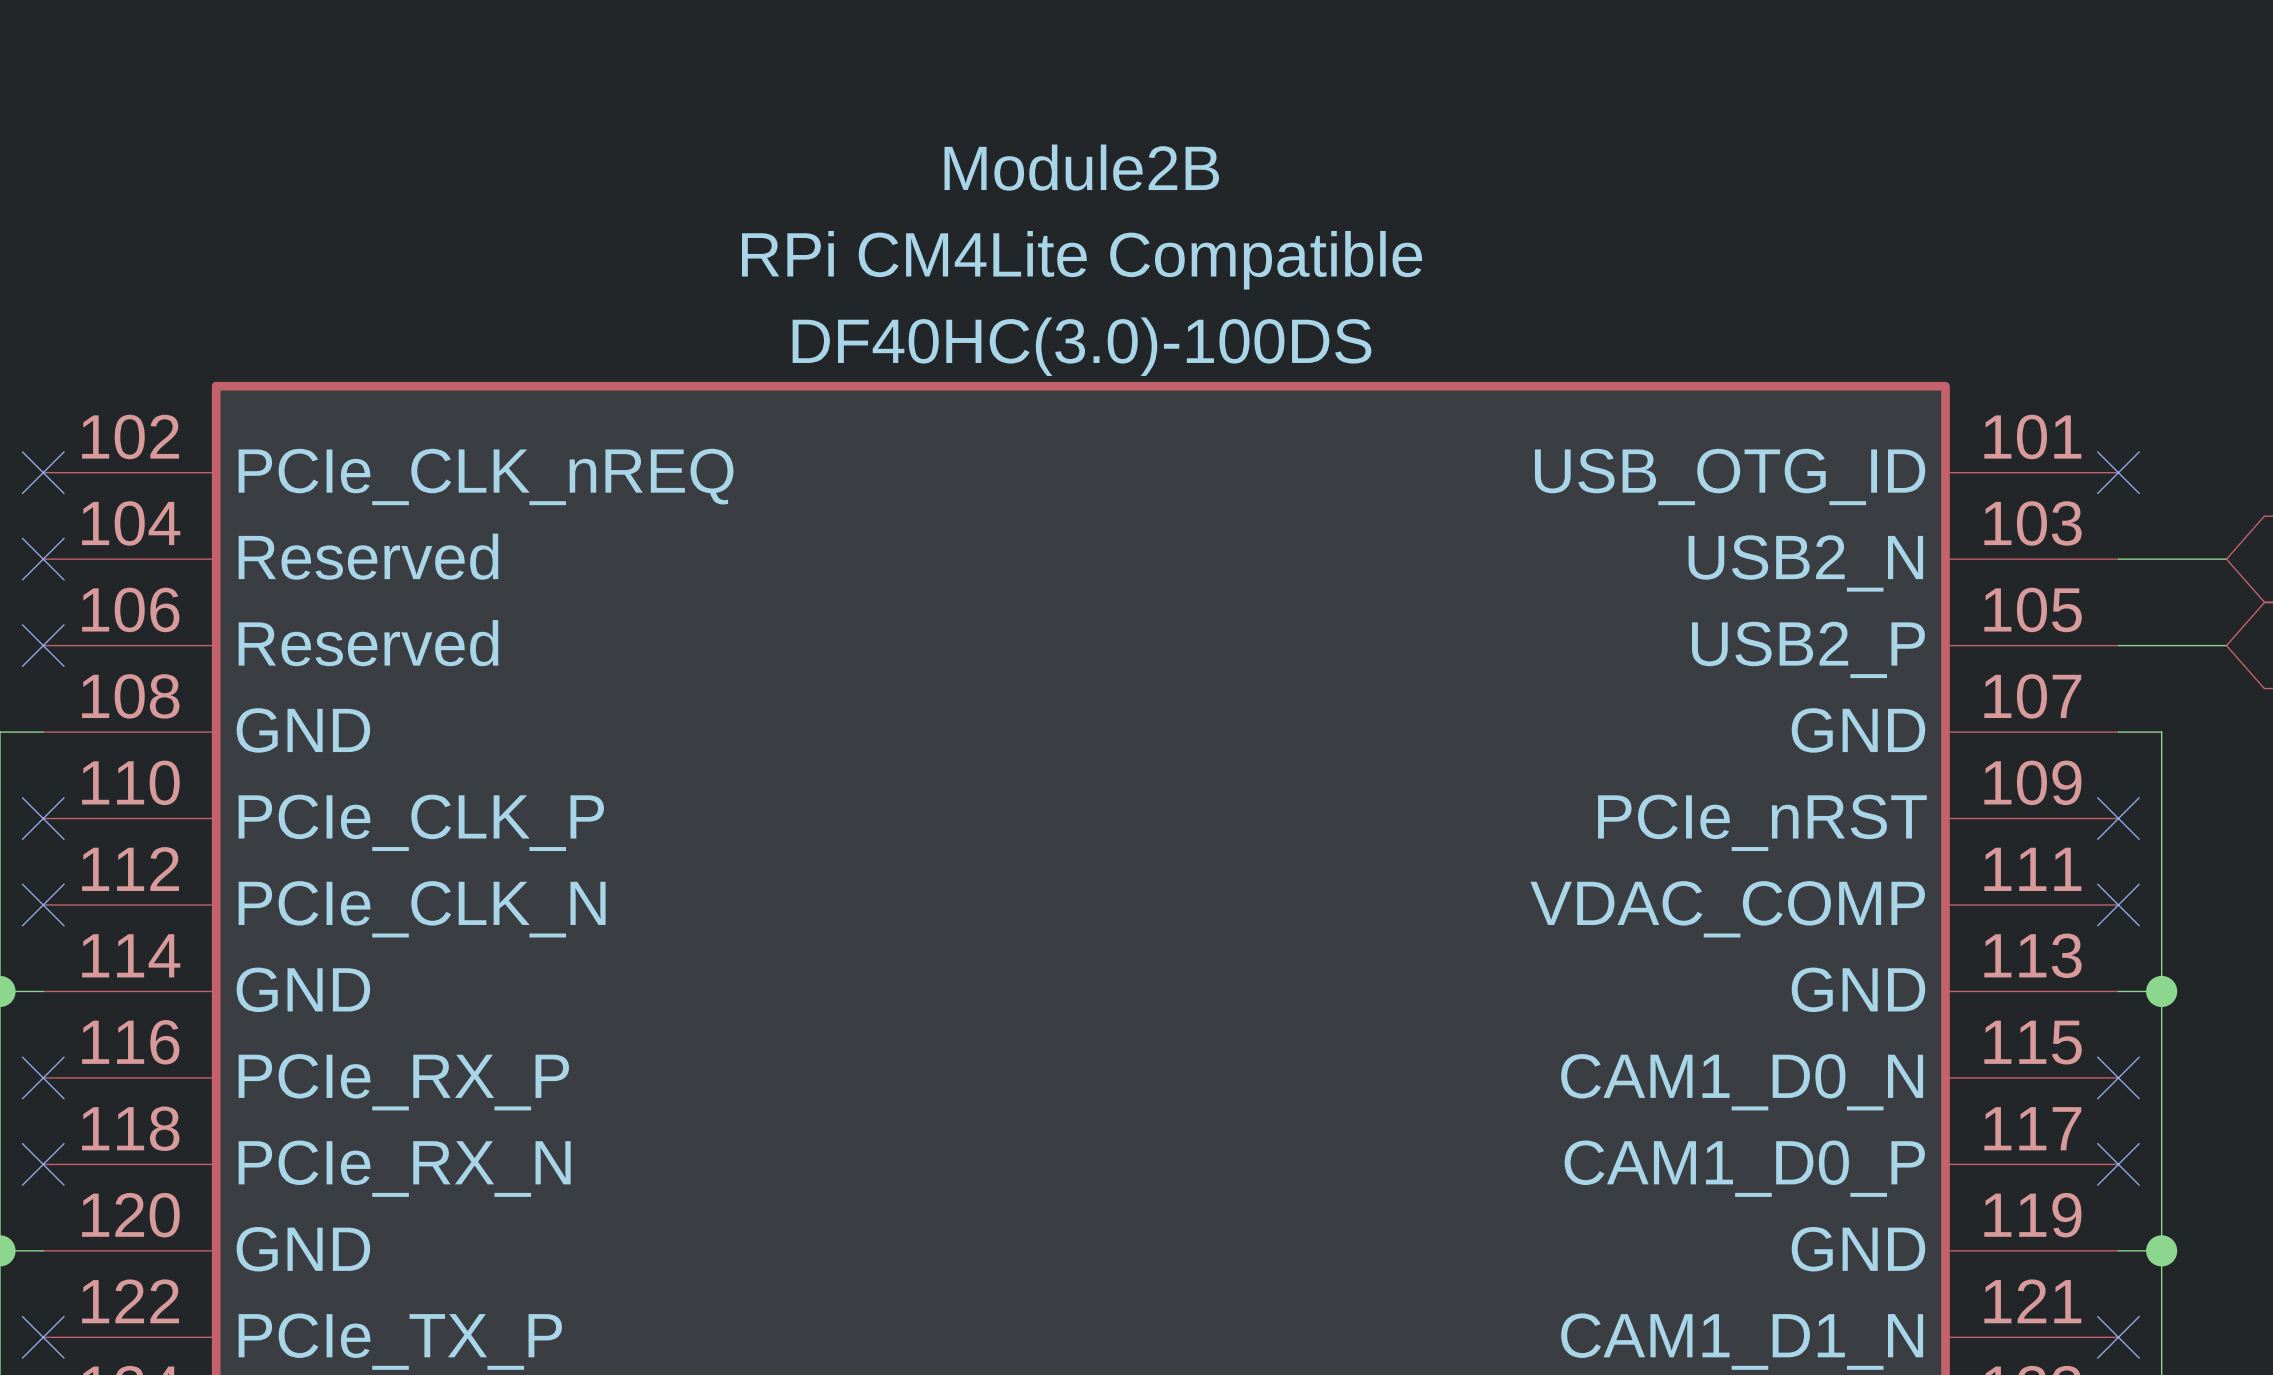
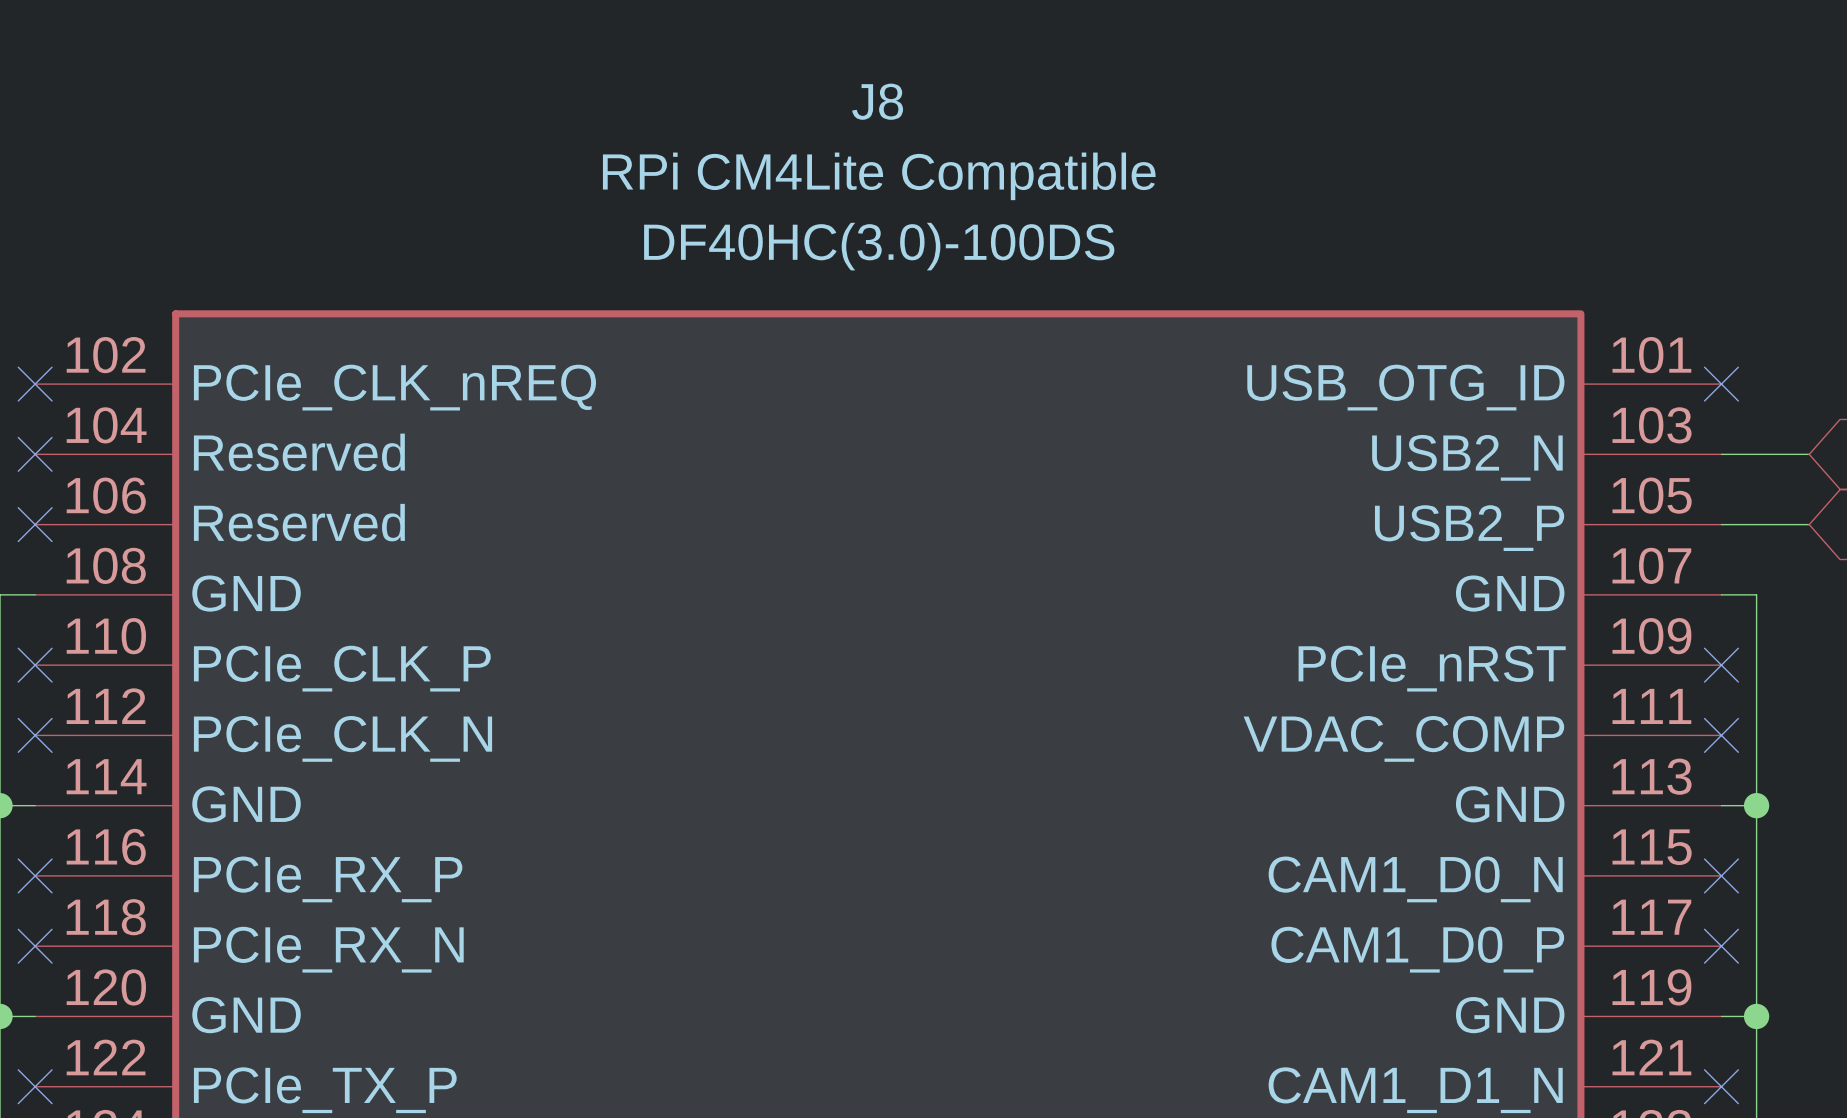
Module2B name: Module2B (1081, 167) -> J8 (877, 101)
Module2B value position: RPi CM4Lite Compatible (1082, 260) -> RPi CM4Lite Compatible (879, 176)
Module2B text position: DF40HC(3.0)-100DS (1081, 346) -> DF40HC(3.0)-100DS (879, 246)

